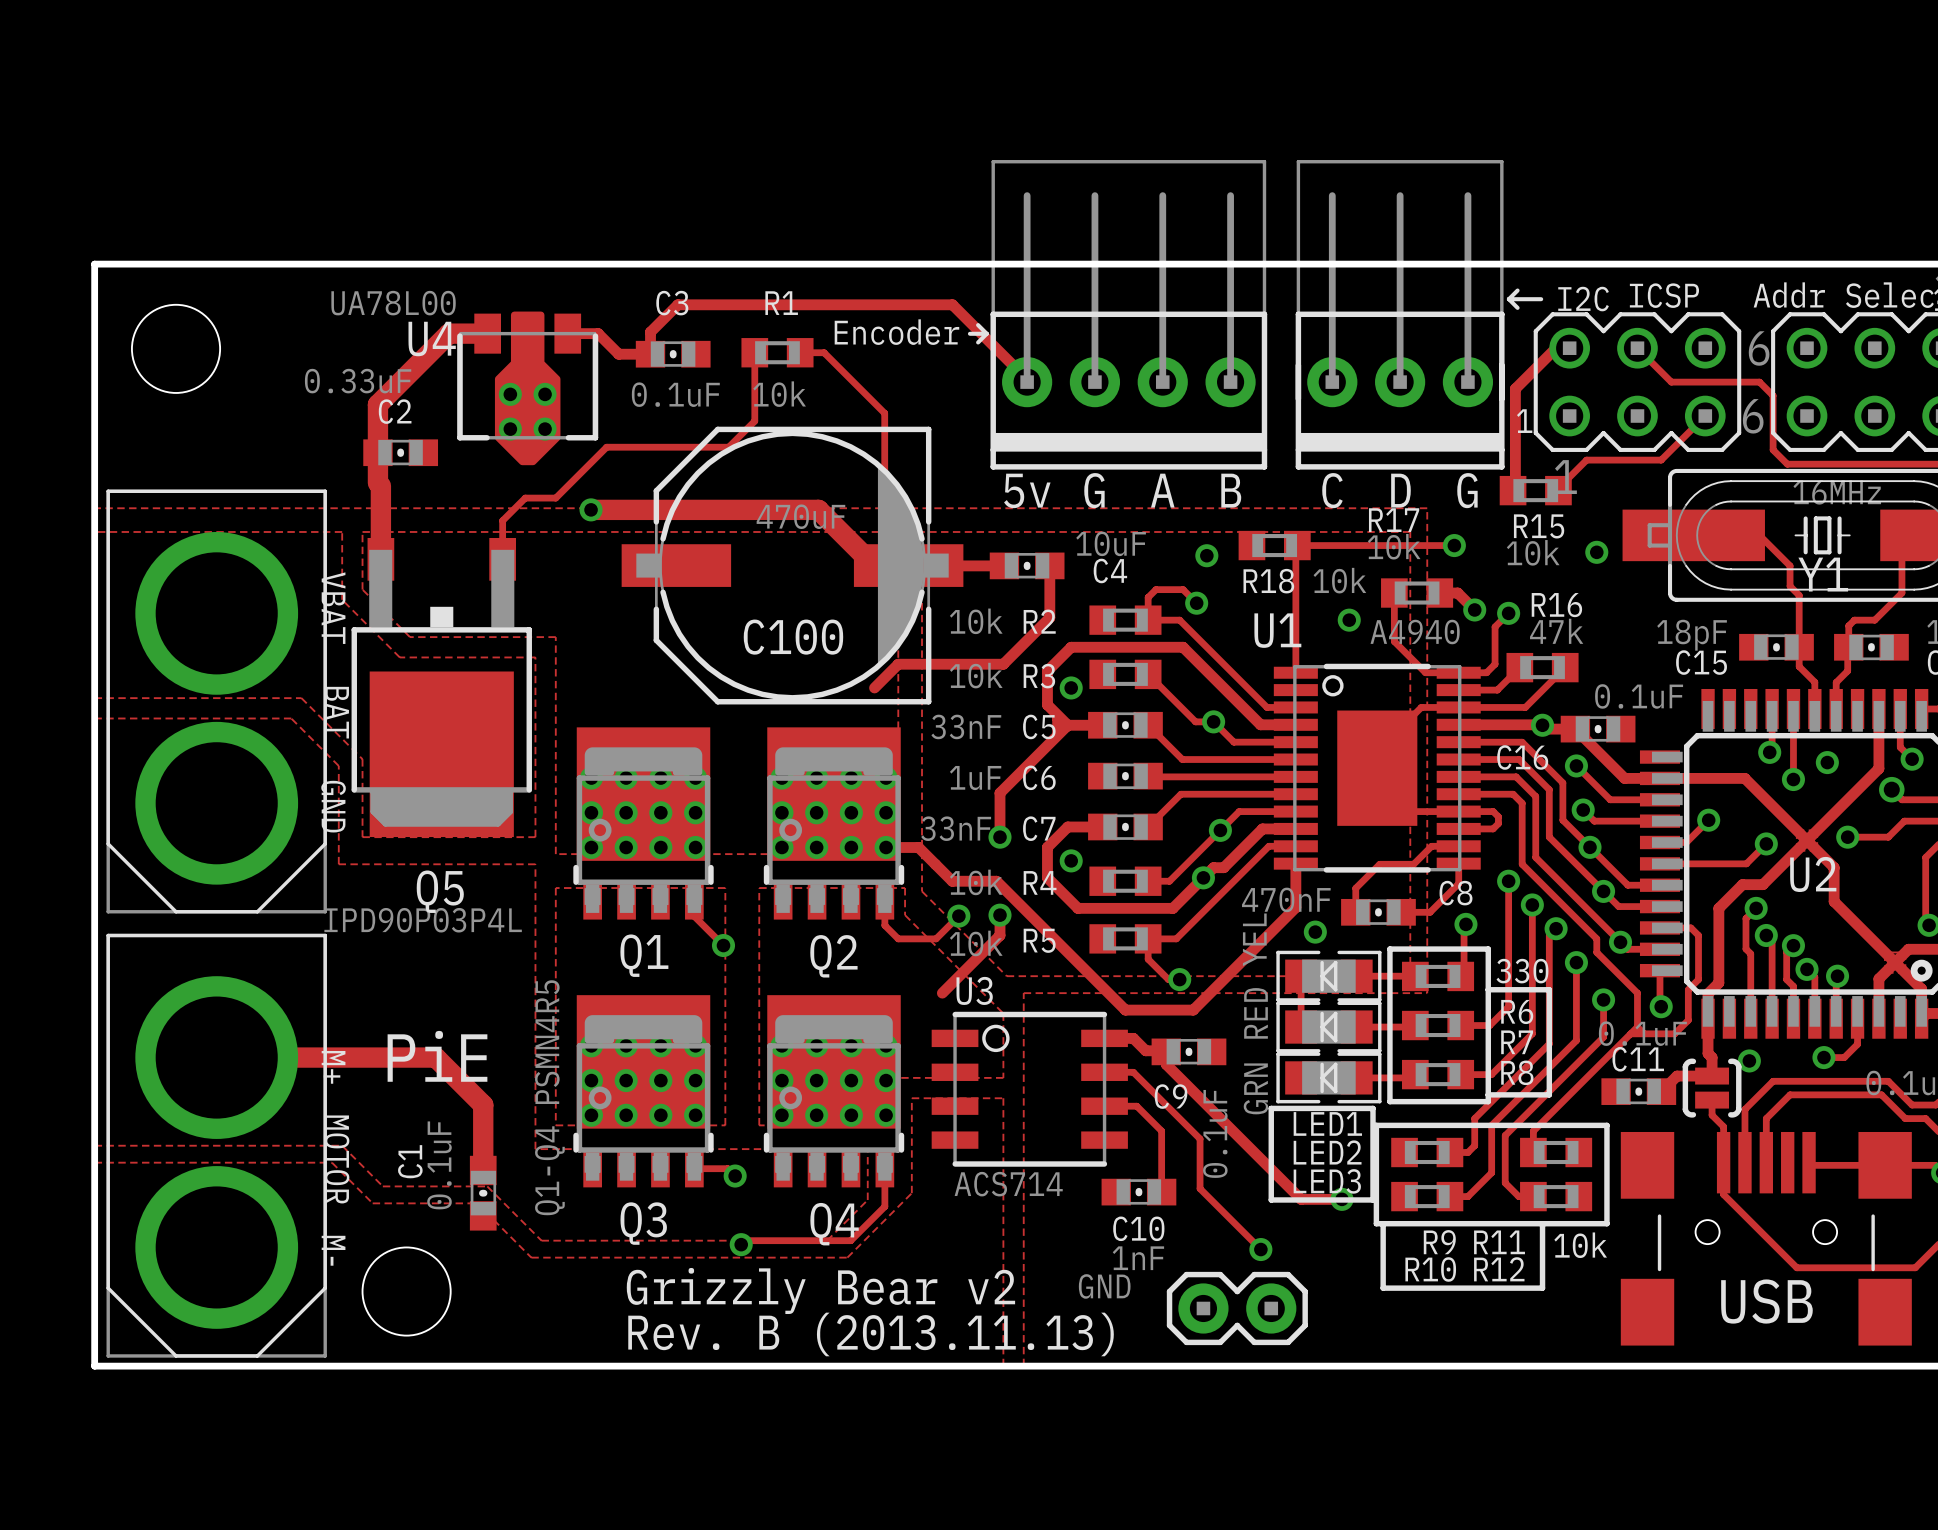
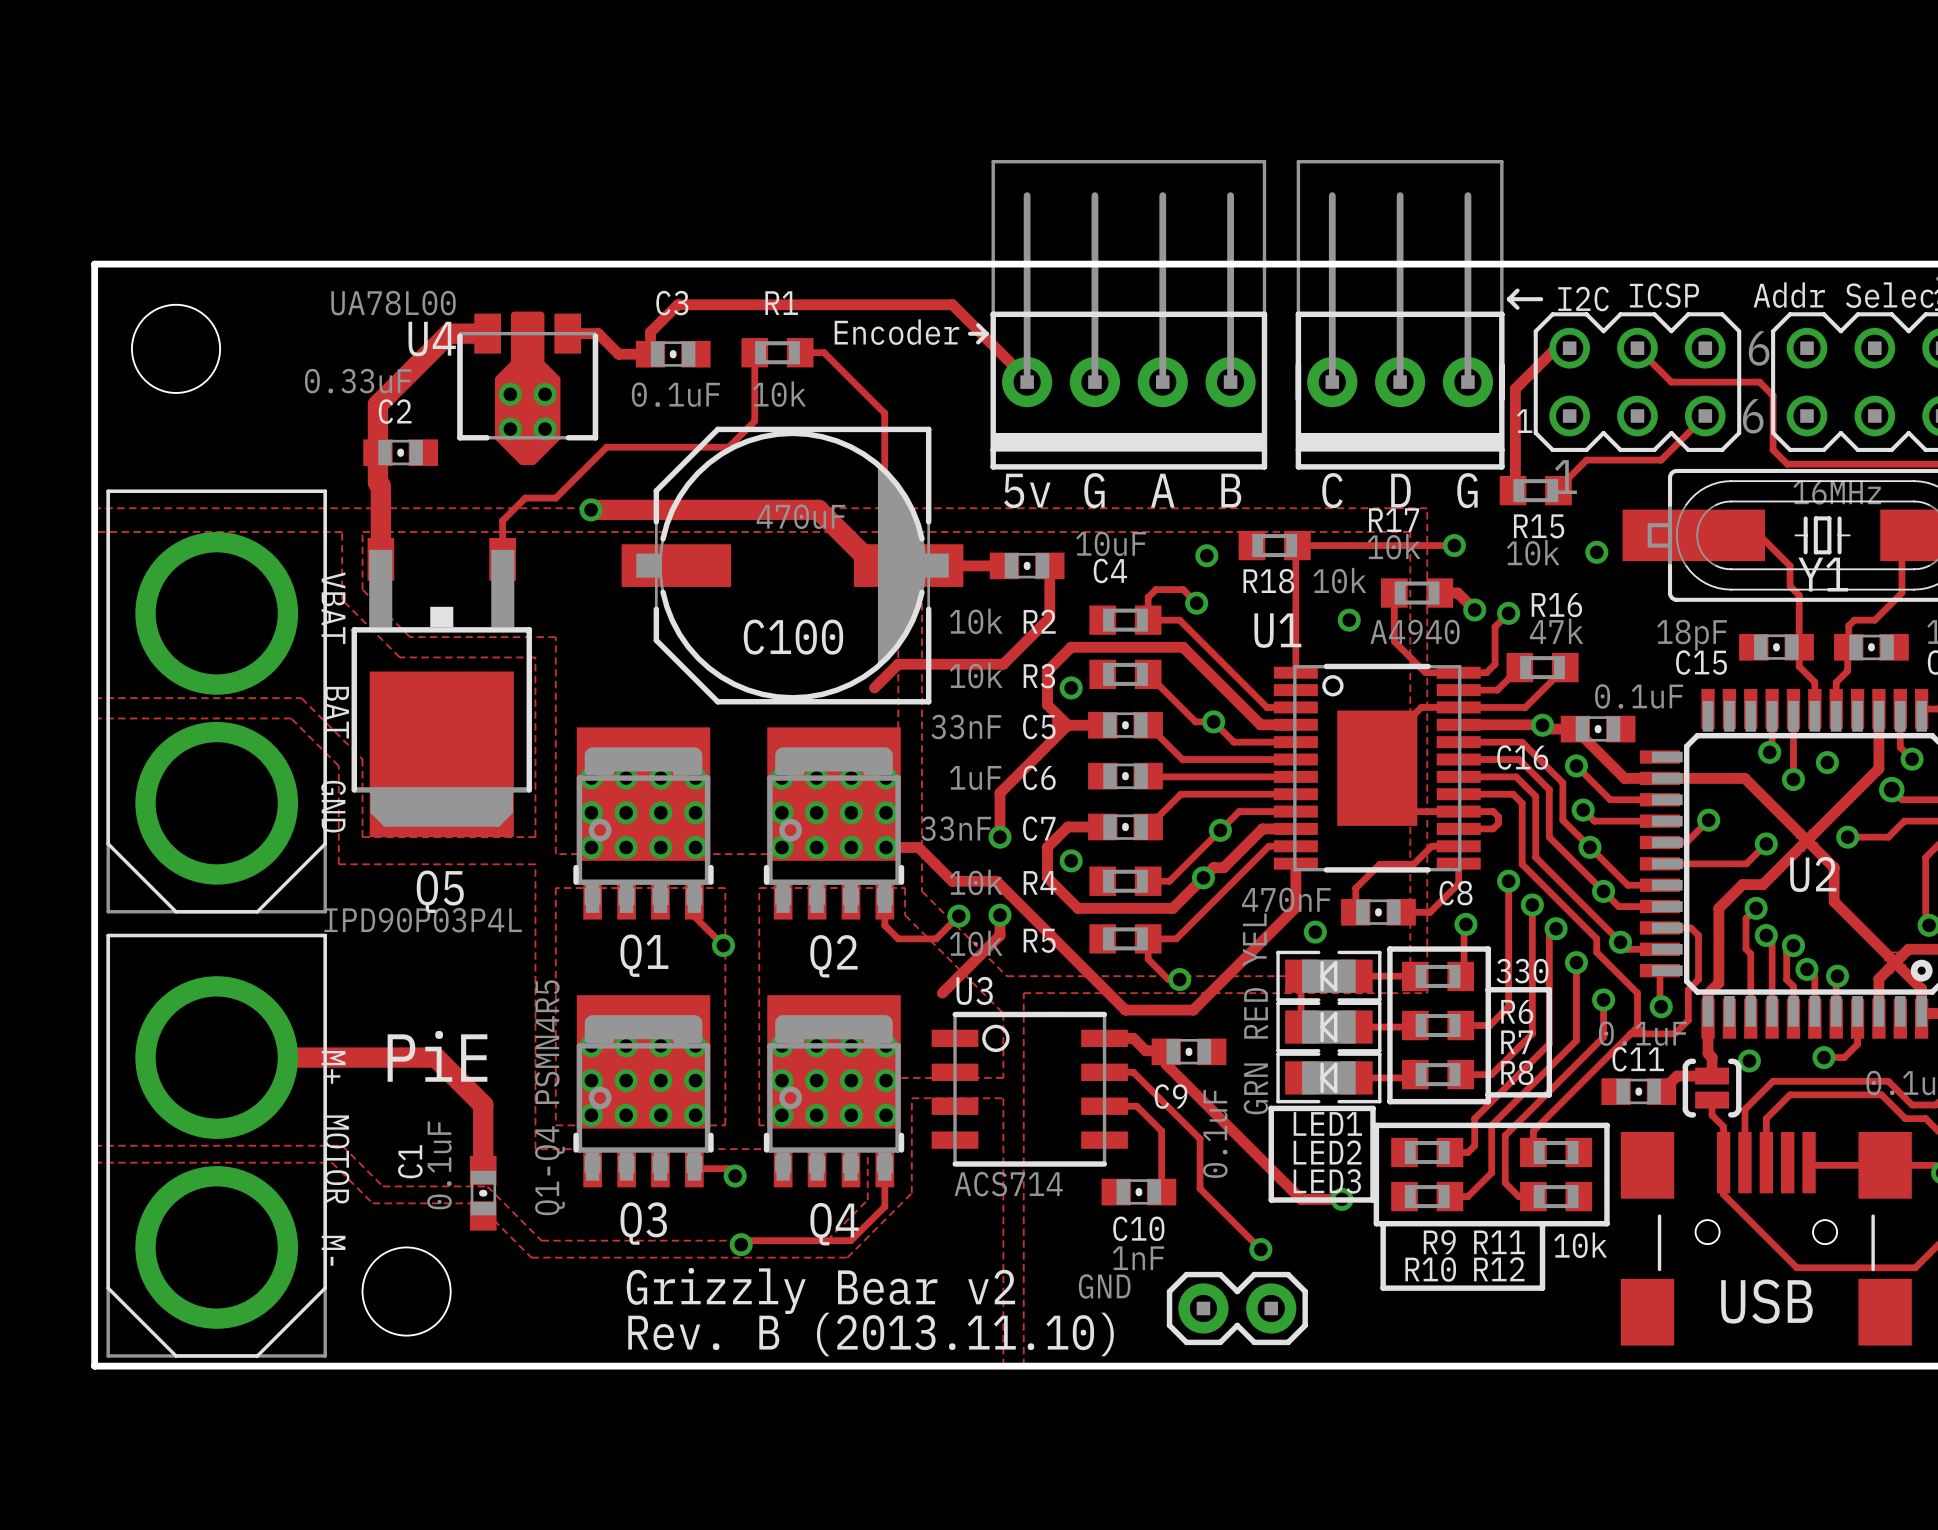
text: Rev. B (2013.11.13) (871, 1334) -> Rev. B (2013.11.10) (871, 1334)

